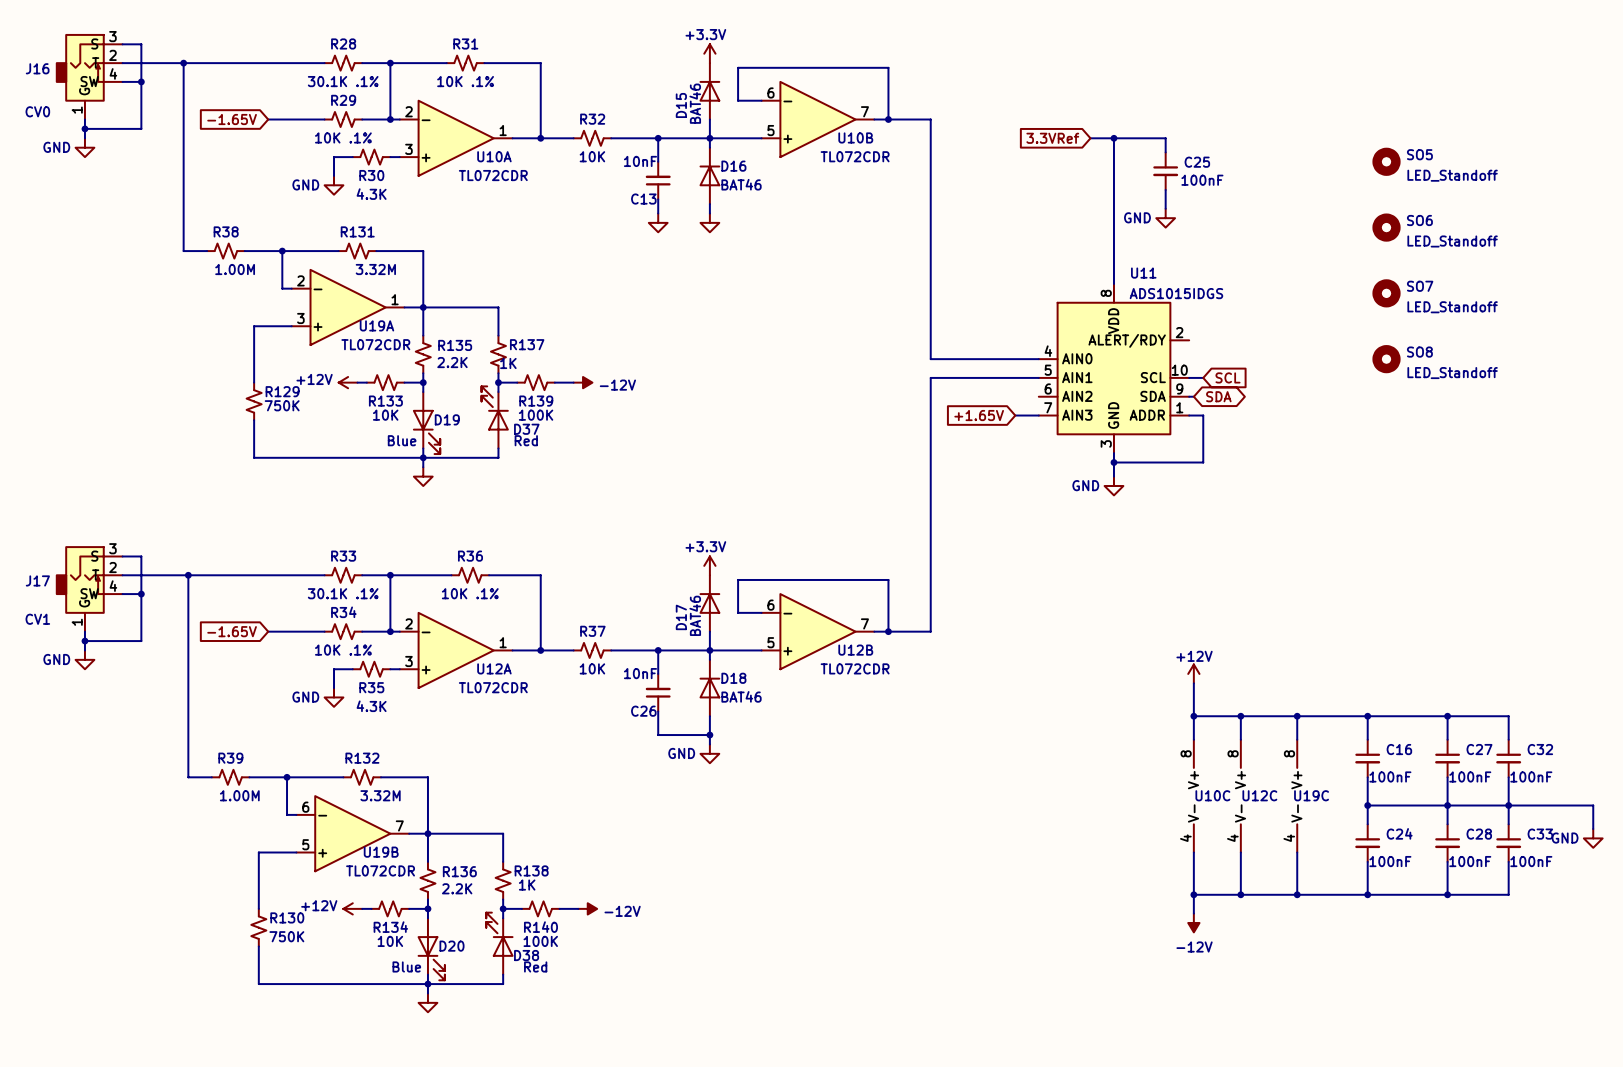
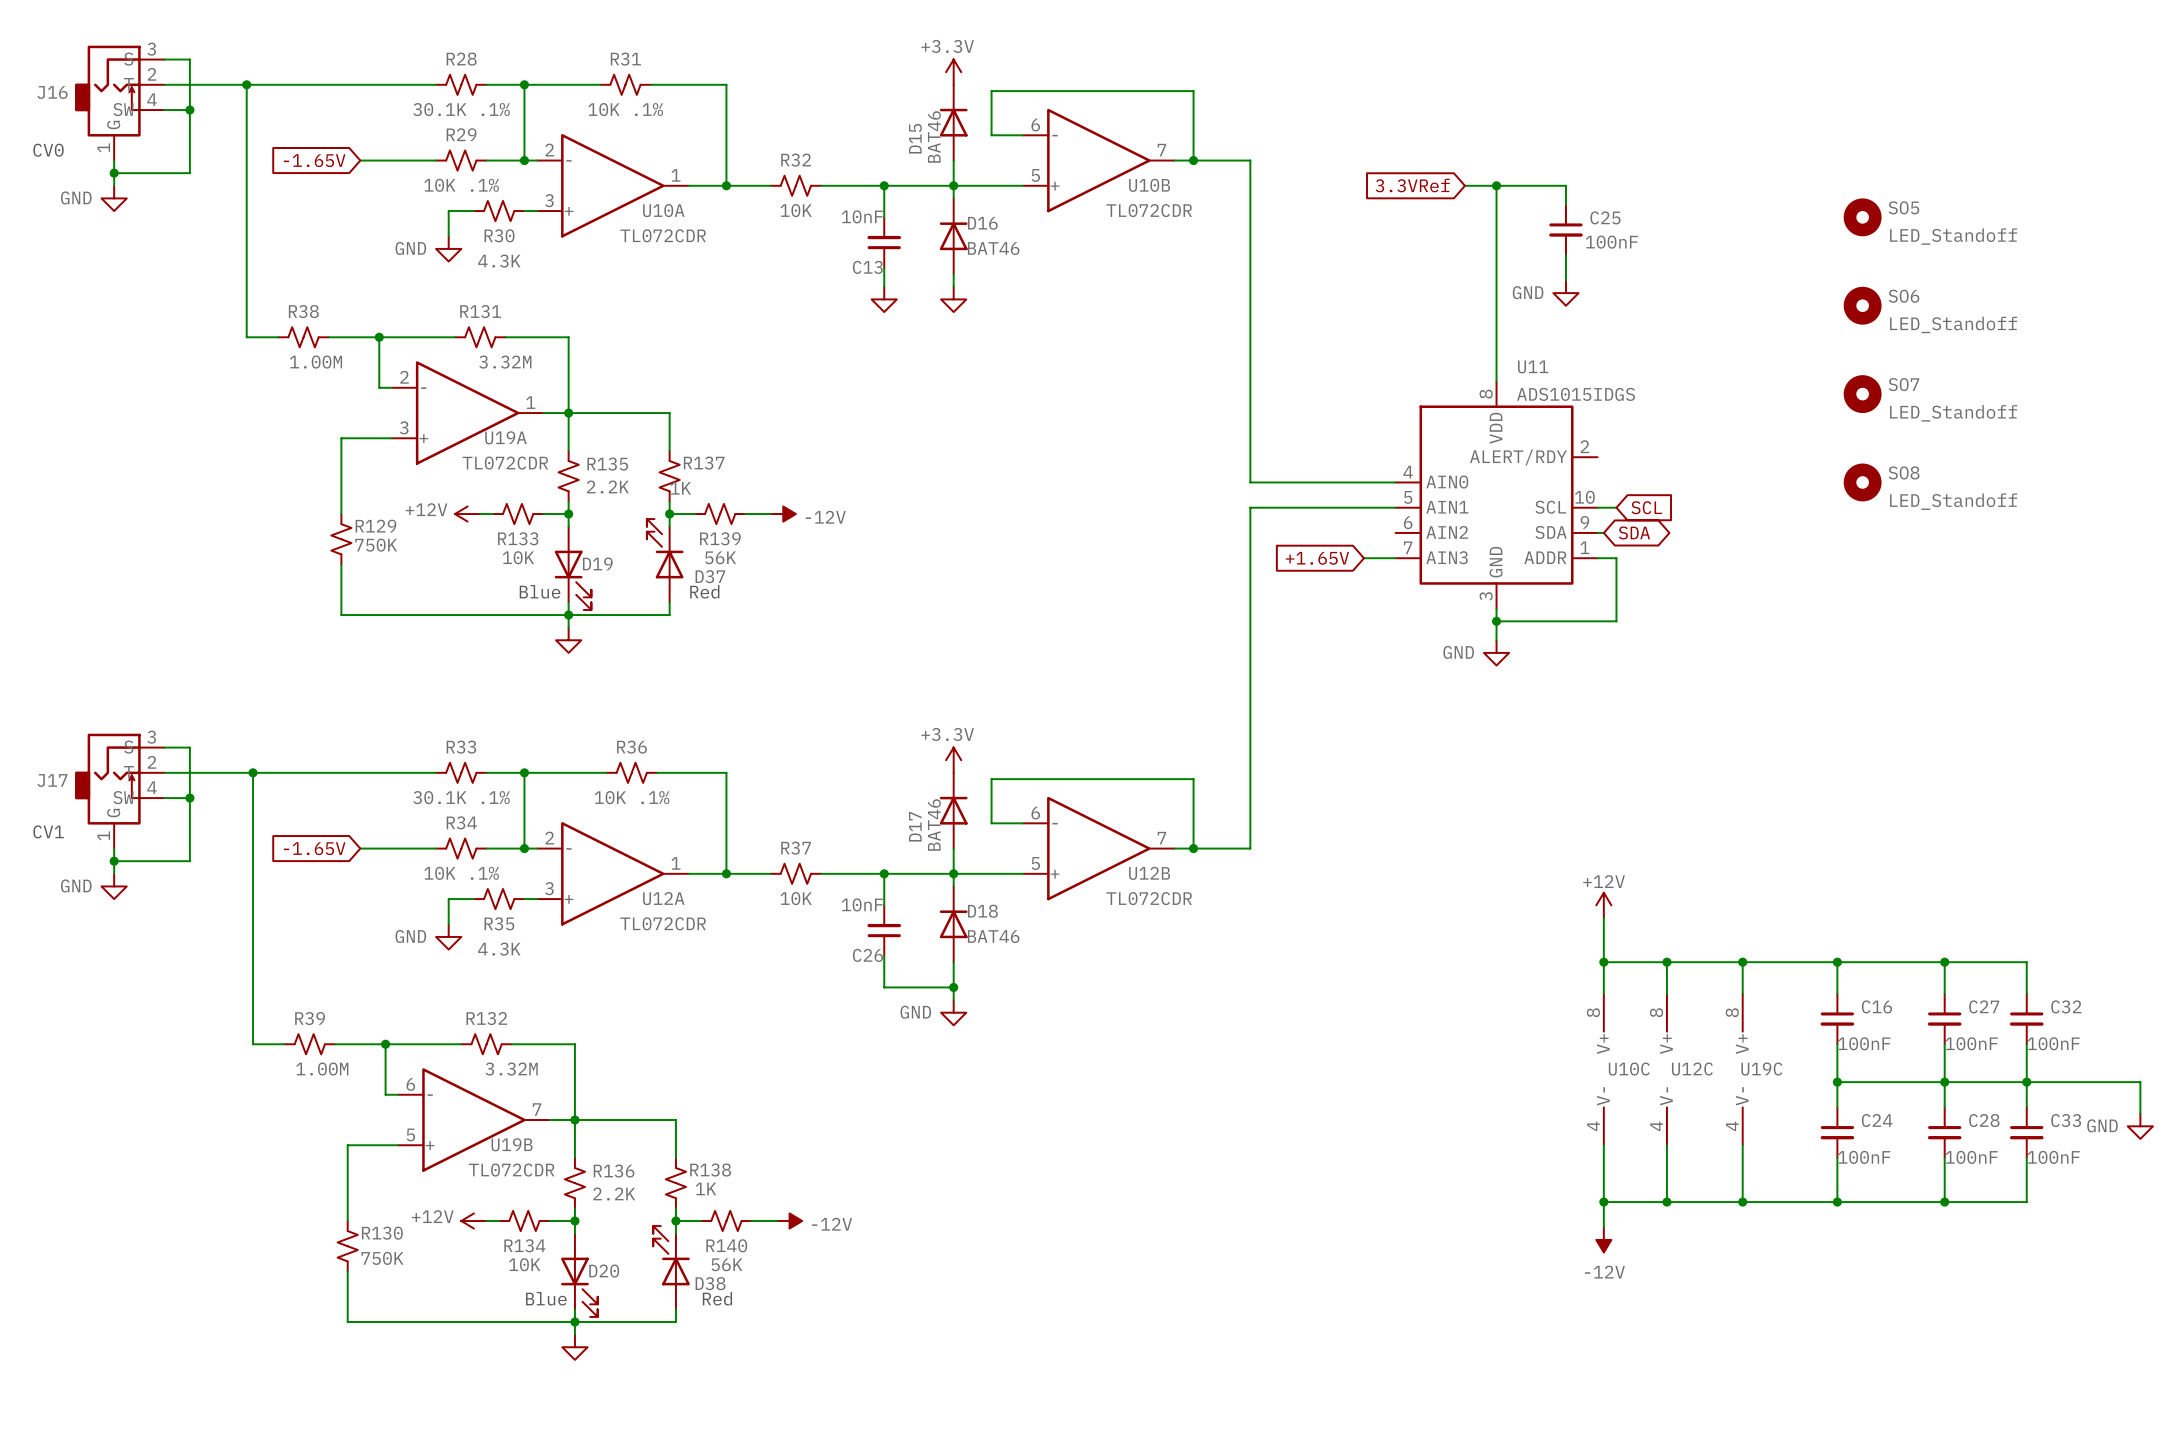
R139 value: 100K (536, 415) -> 56K (720, 557)
R140 value: 100K (540, 941) -> 56K (726, 1264)

